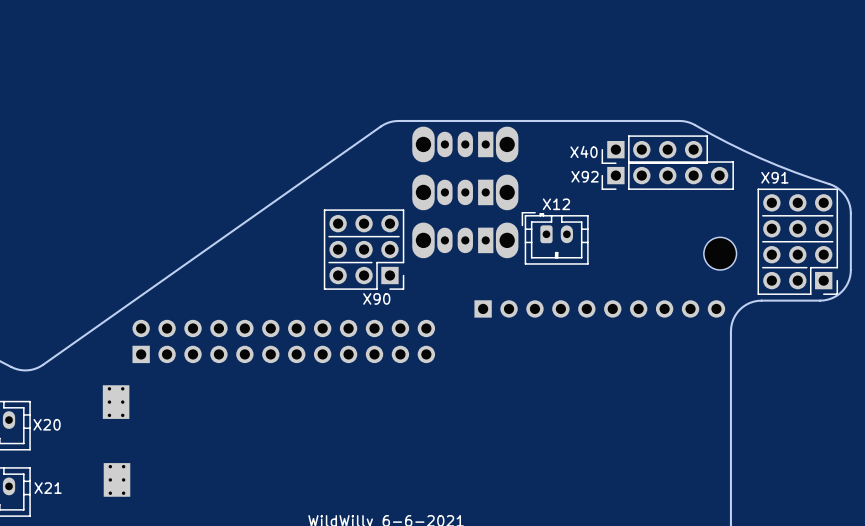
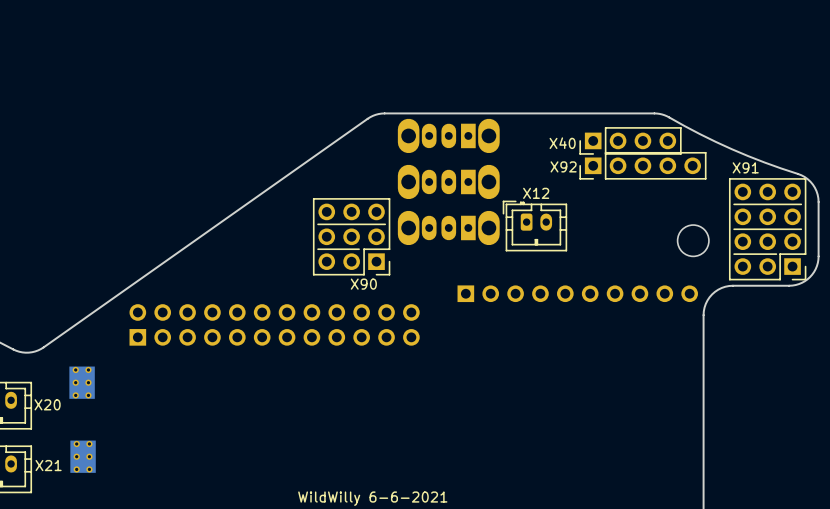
part position: (116, 402) -> (82, 382)
part position: (116, 479) -> (83, 456)

